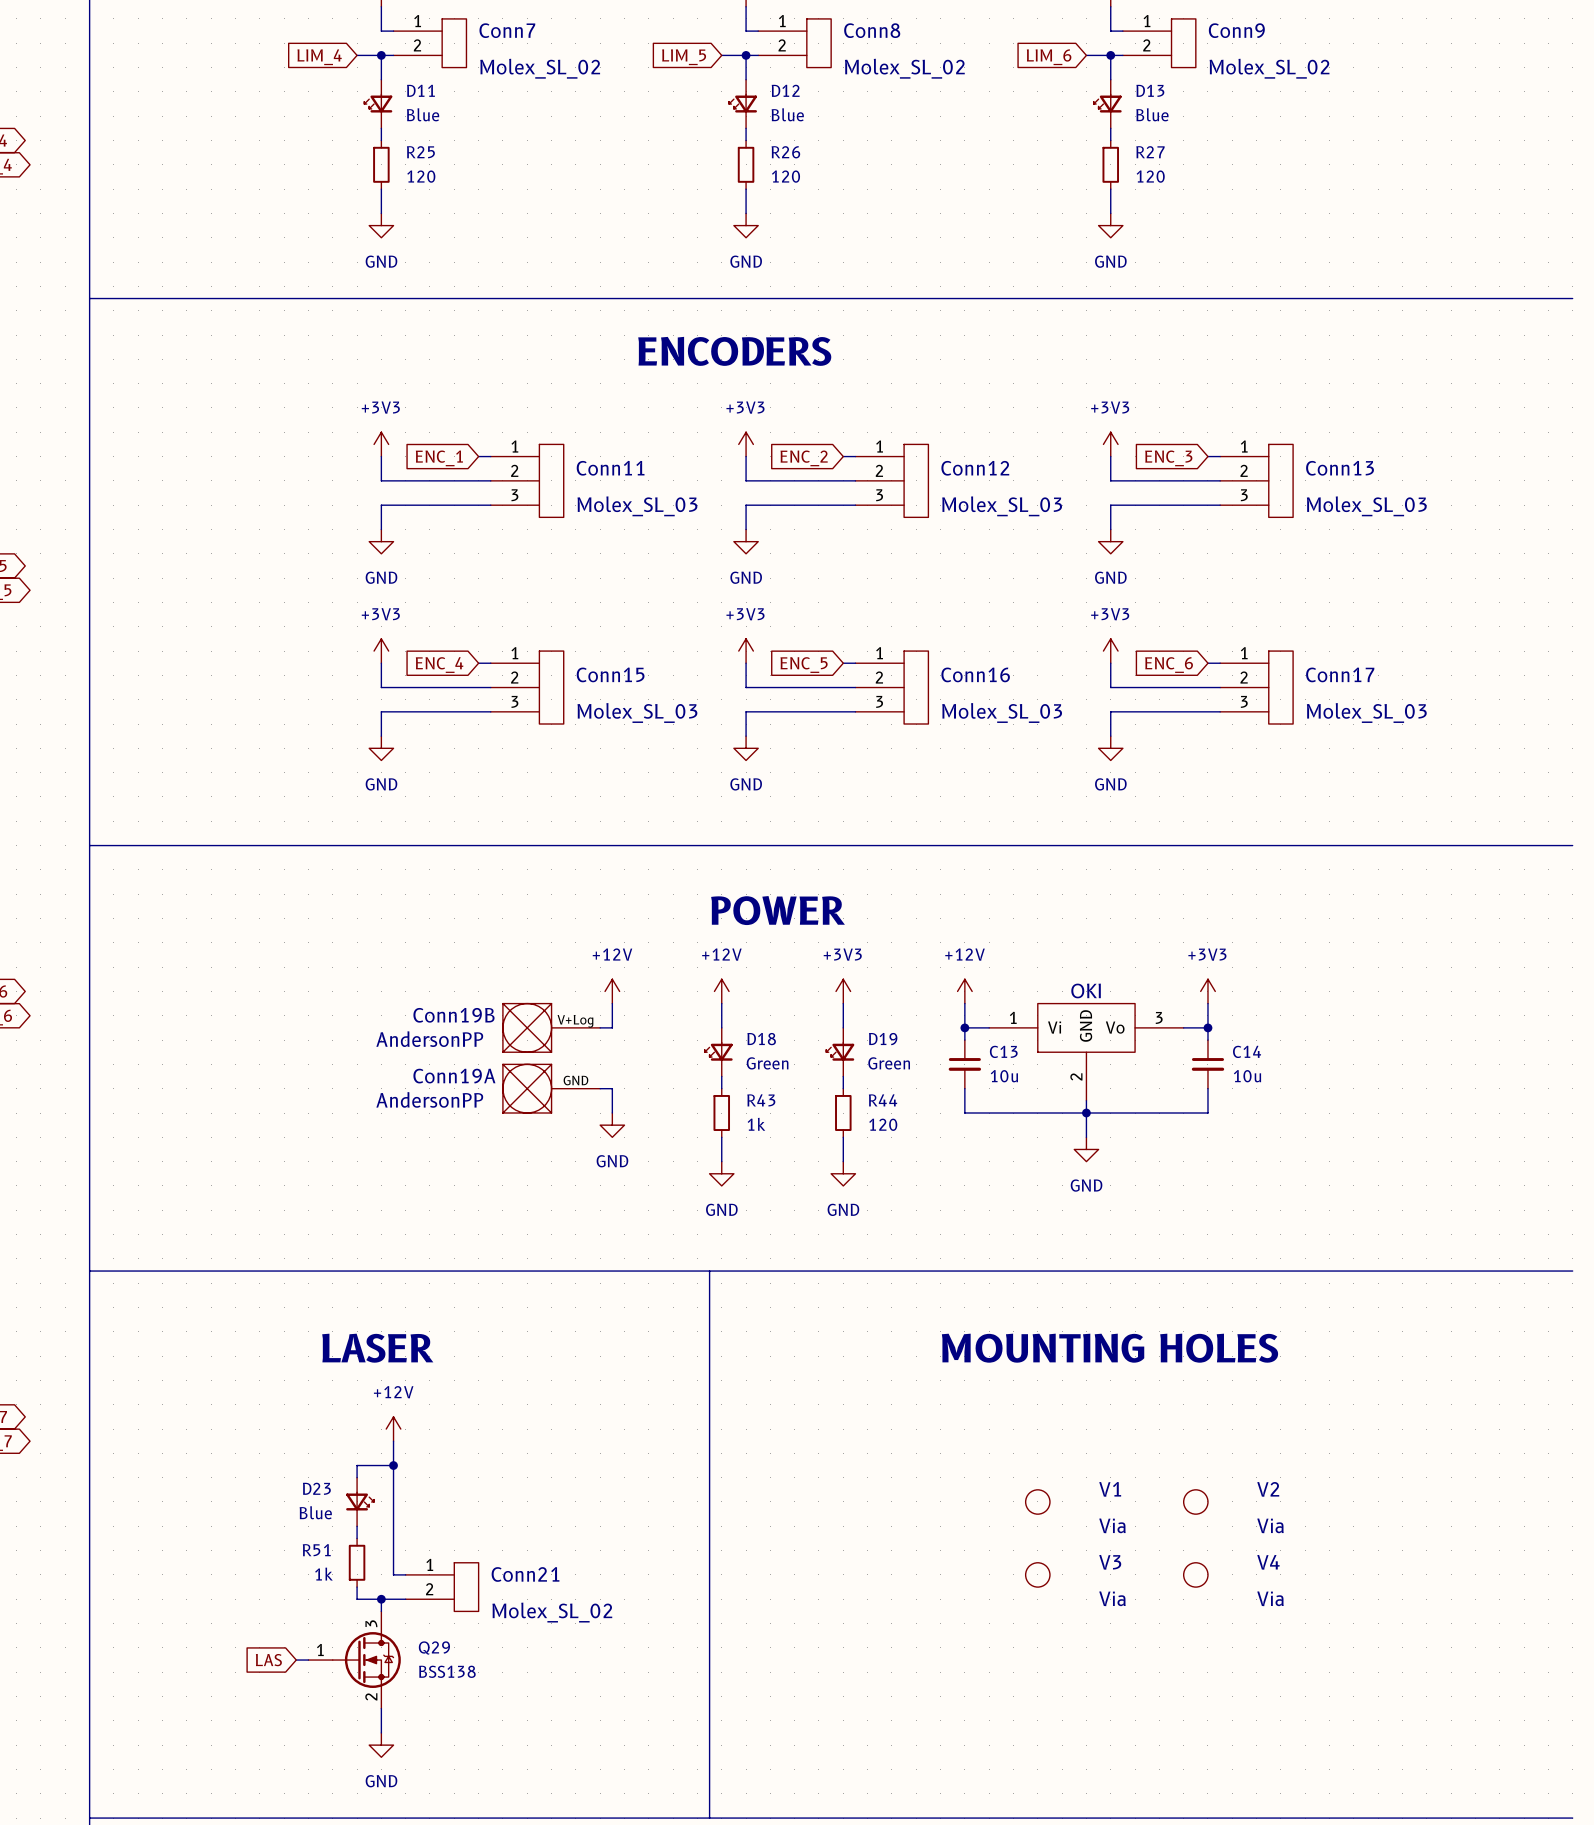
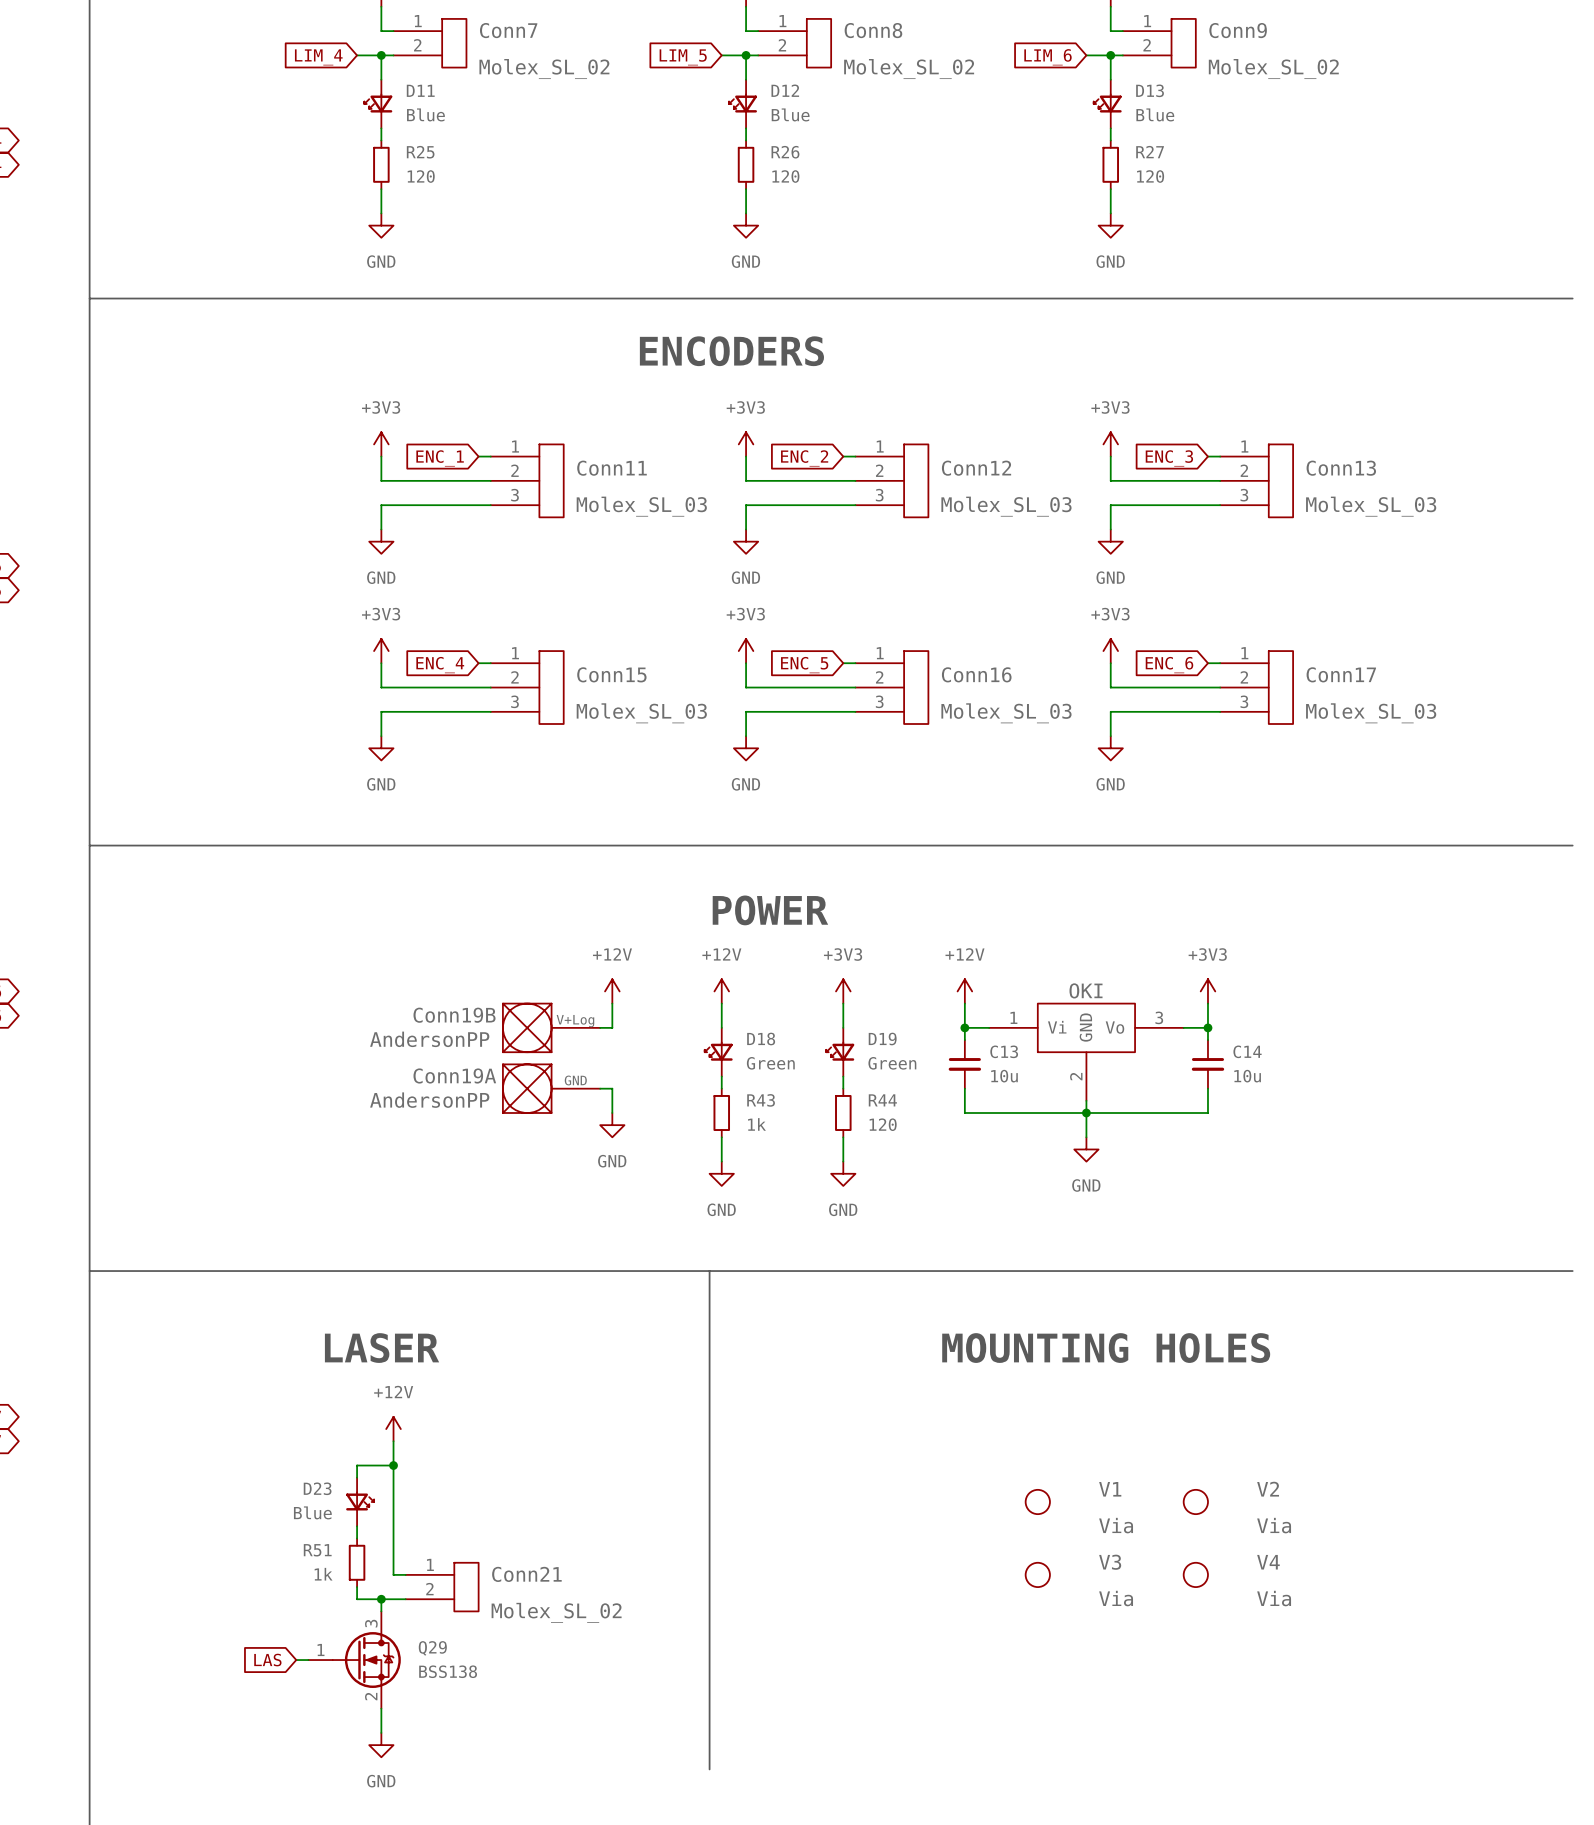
line: (709, 1769) (709, 1818) -> none
line: (89, 1818) (1572, 1818) -> none

